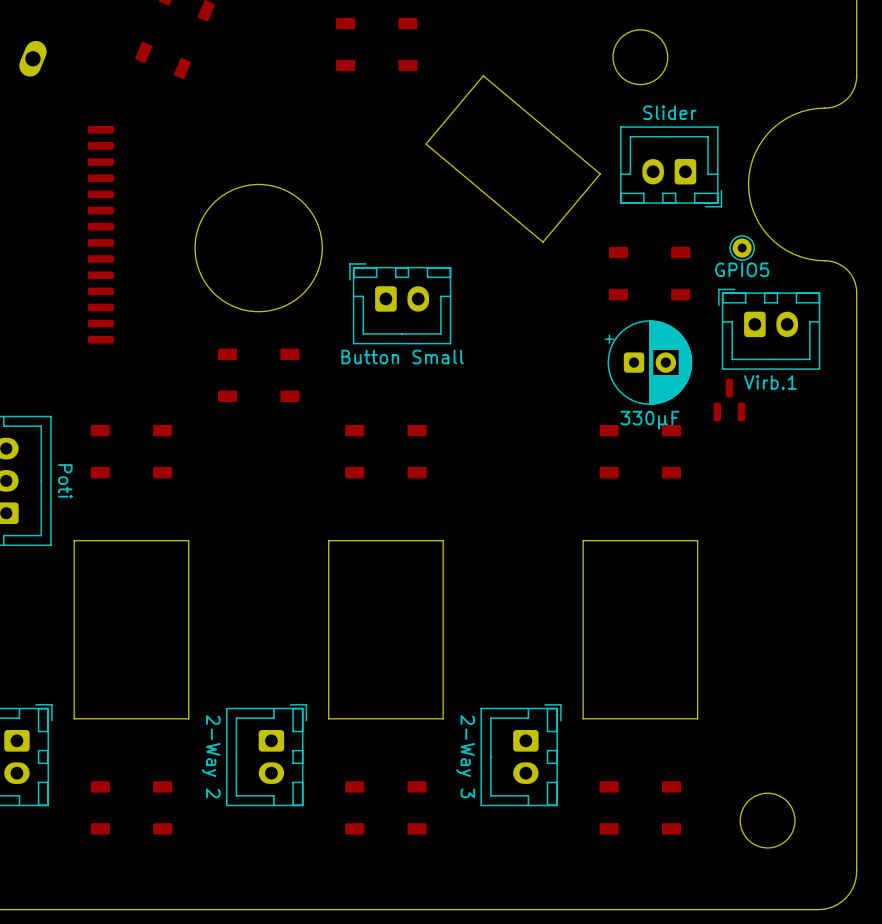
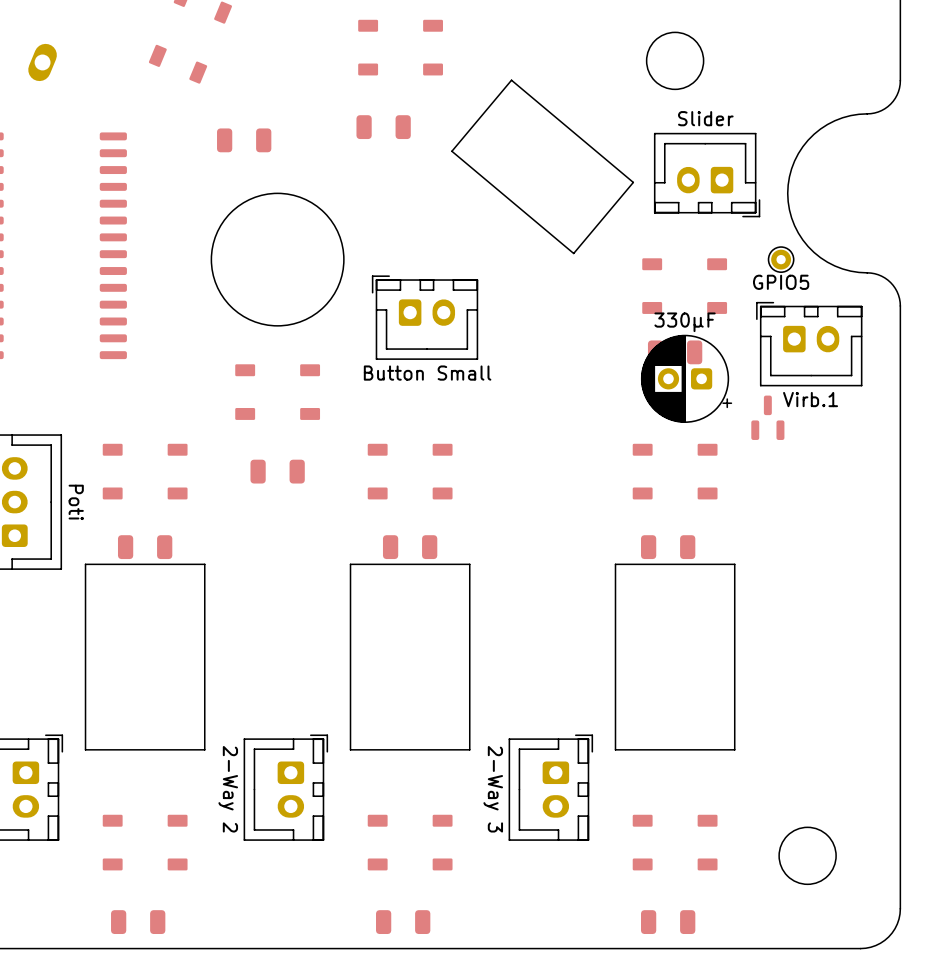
part: none -> (383, 127)
part: none -> (244, 140)
part: none -> (675, 352)
part rotation: 0° (648, 362) -> 180° (686, 378)
part: none -> (277, 471)
part: none -> (145, 547)
part: none -> (410, 547)
part: none -> (668, 547)
part: none -> (138, 922)
part: none -> (403, 922)
part: none -> (668, 922)

